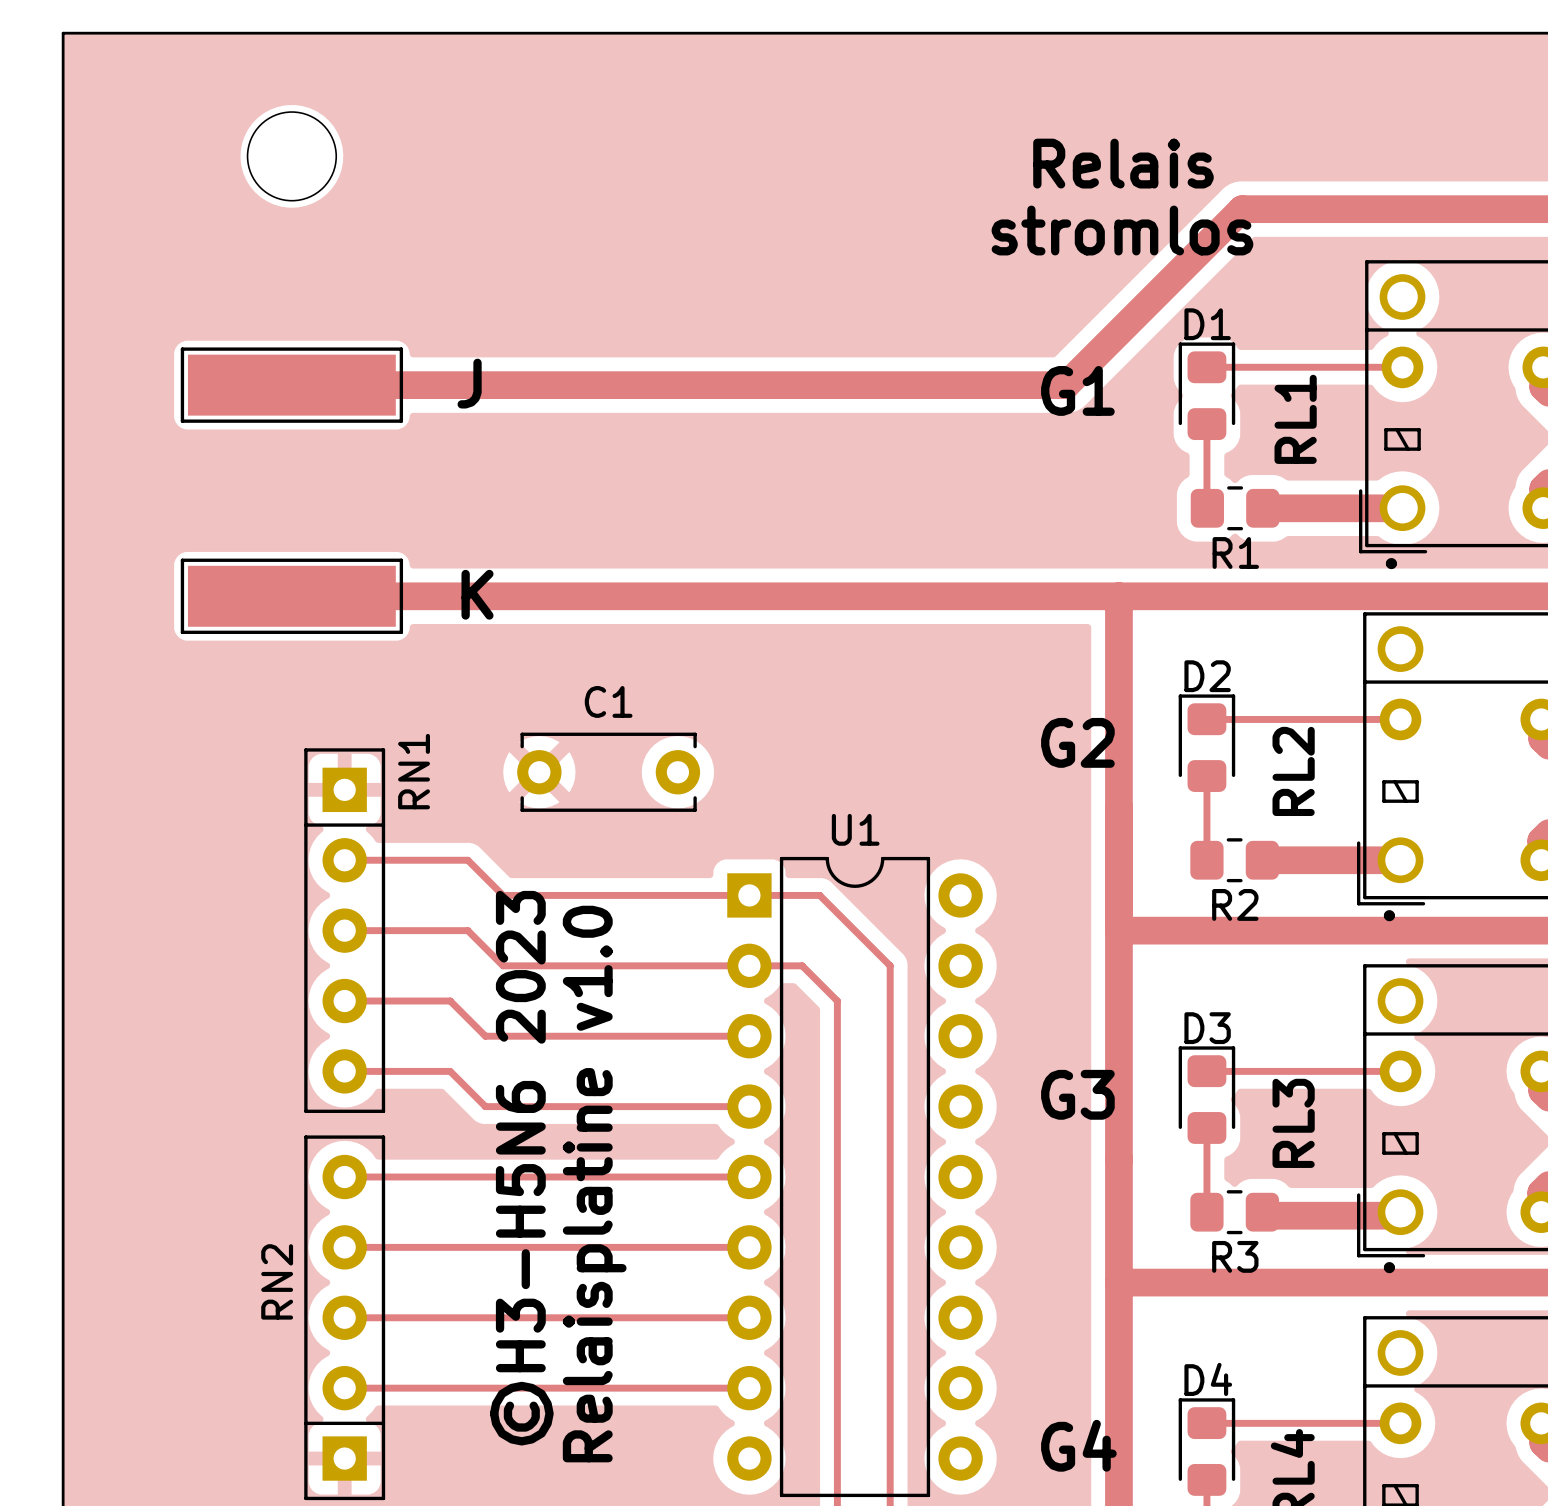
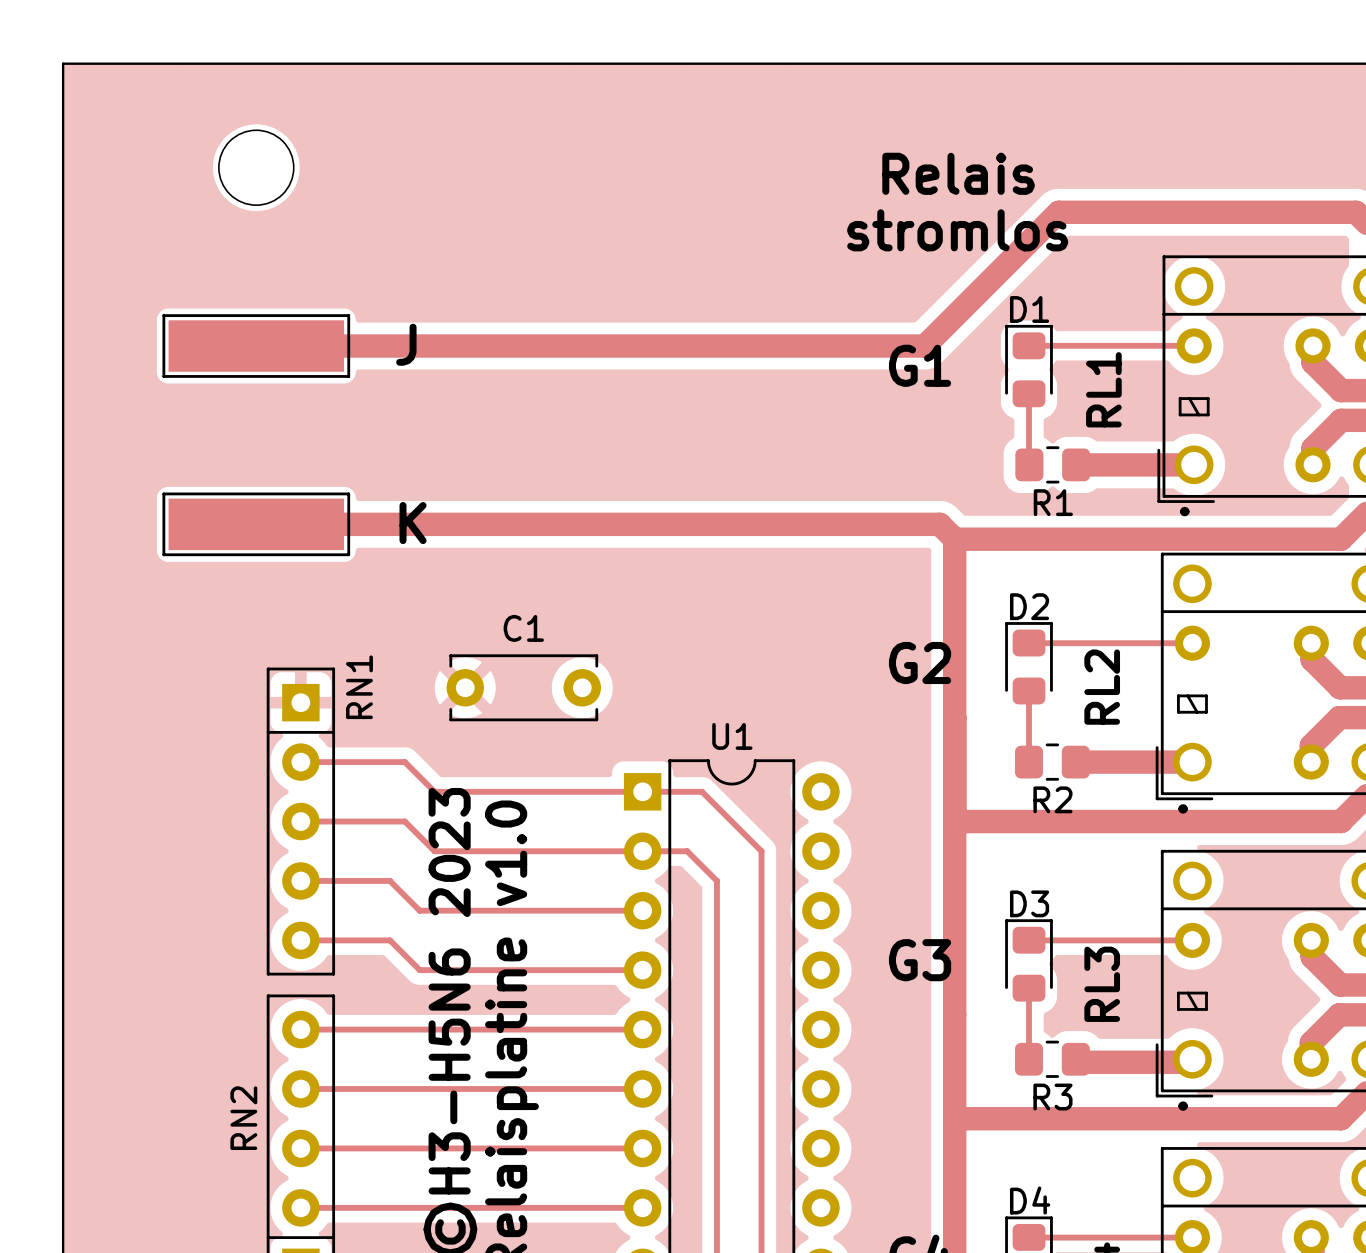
track: (1083, 367) (1066, 385) (291, 385) -> (924, 346) (256, 346)
part position: (291, 385) -> (256, 346)
track: (291, 596) (1118, 596) -> (256, 524) (939, 524) (954, 539)
part position: (291, 596) -> (256, 524)

